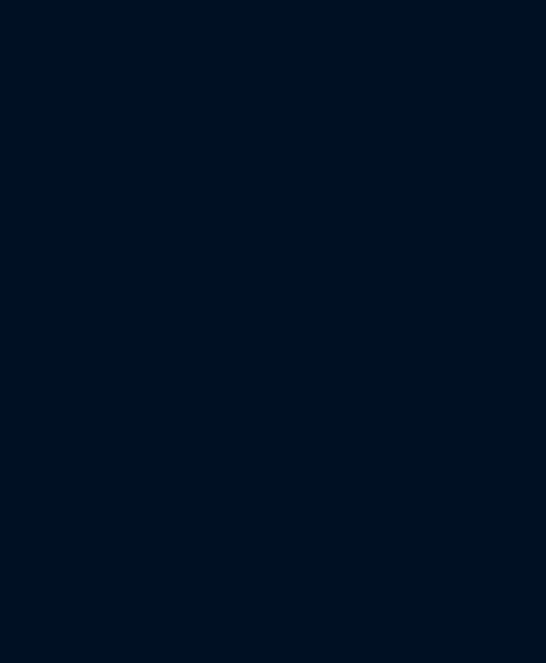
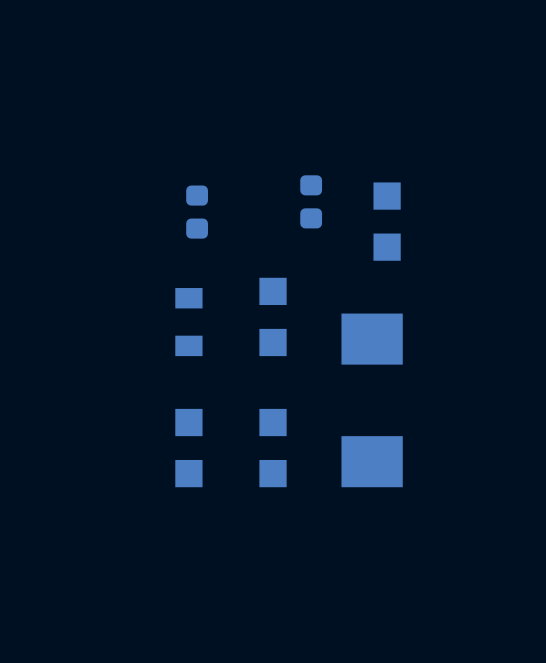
part: none -> (311, 201)
part: none -> (197, 212)
part: none -> (387, 221)
part: none -> (273, 316)
part: none -> (188, 322)
part: none -> (372, 400)
part: none -> (188, 448)
part: none -> (273, 448)

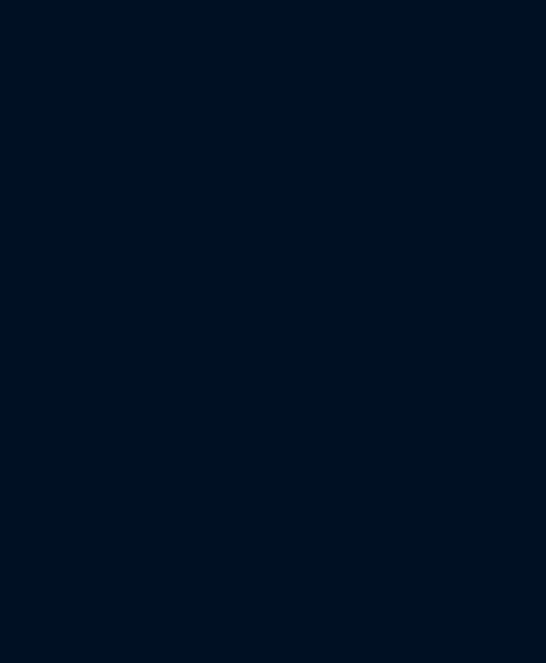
part: (311, 201) -> none
part: (197, 212) -> none
part: (387, 221) -> none
part: (273, 316) -> none
part: (188, 322) -> none
part: (372, 400) -> none
part: (188, 448) -> none
part: (273, 448) -> none

